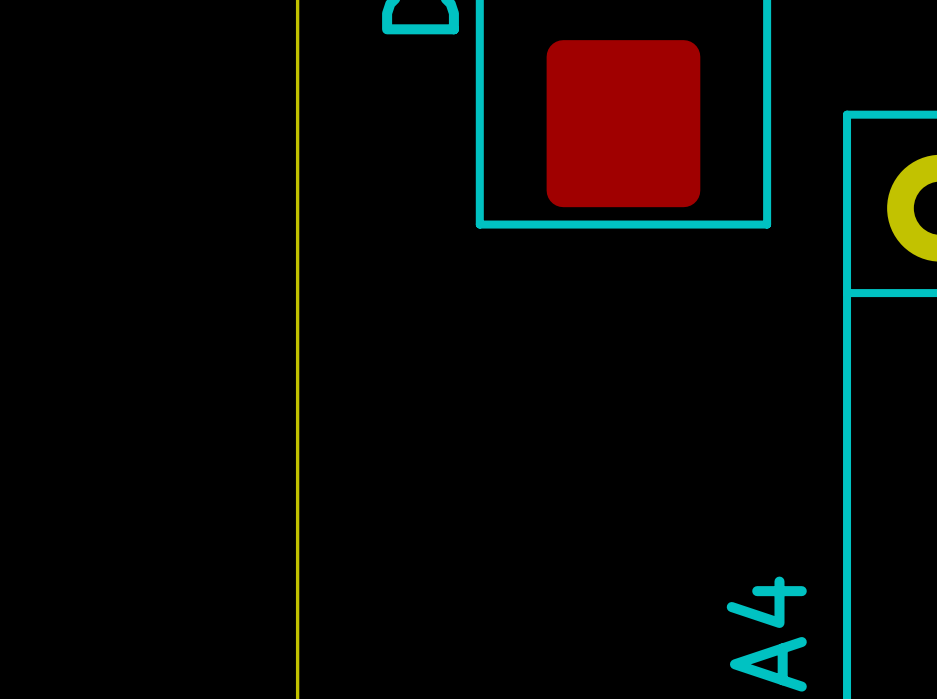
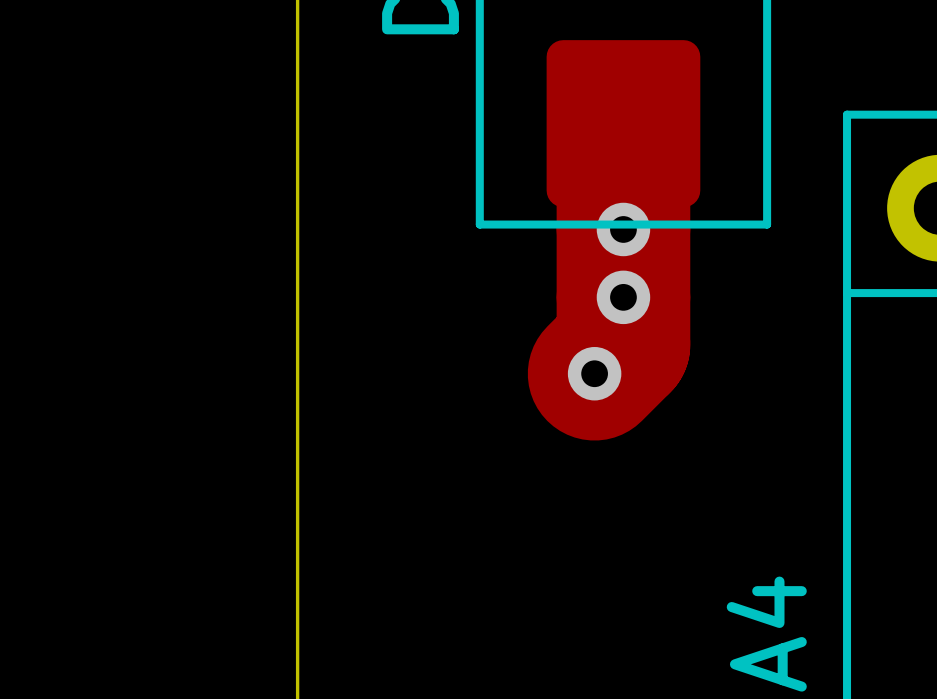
track: none -> (623, 123) (623, 344) (594, 373)
via: none -> (623, 229)
via: none -> (623, 297)
via: none -> (594, 373)

